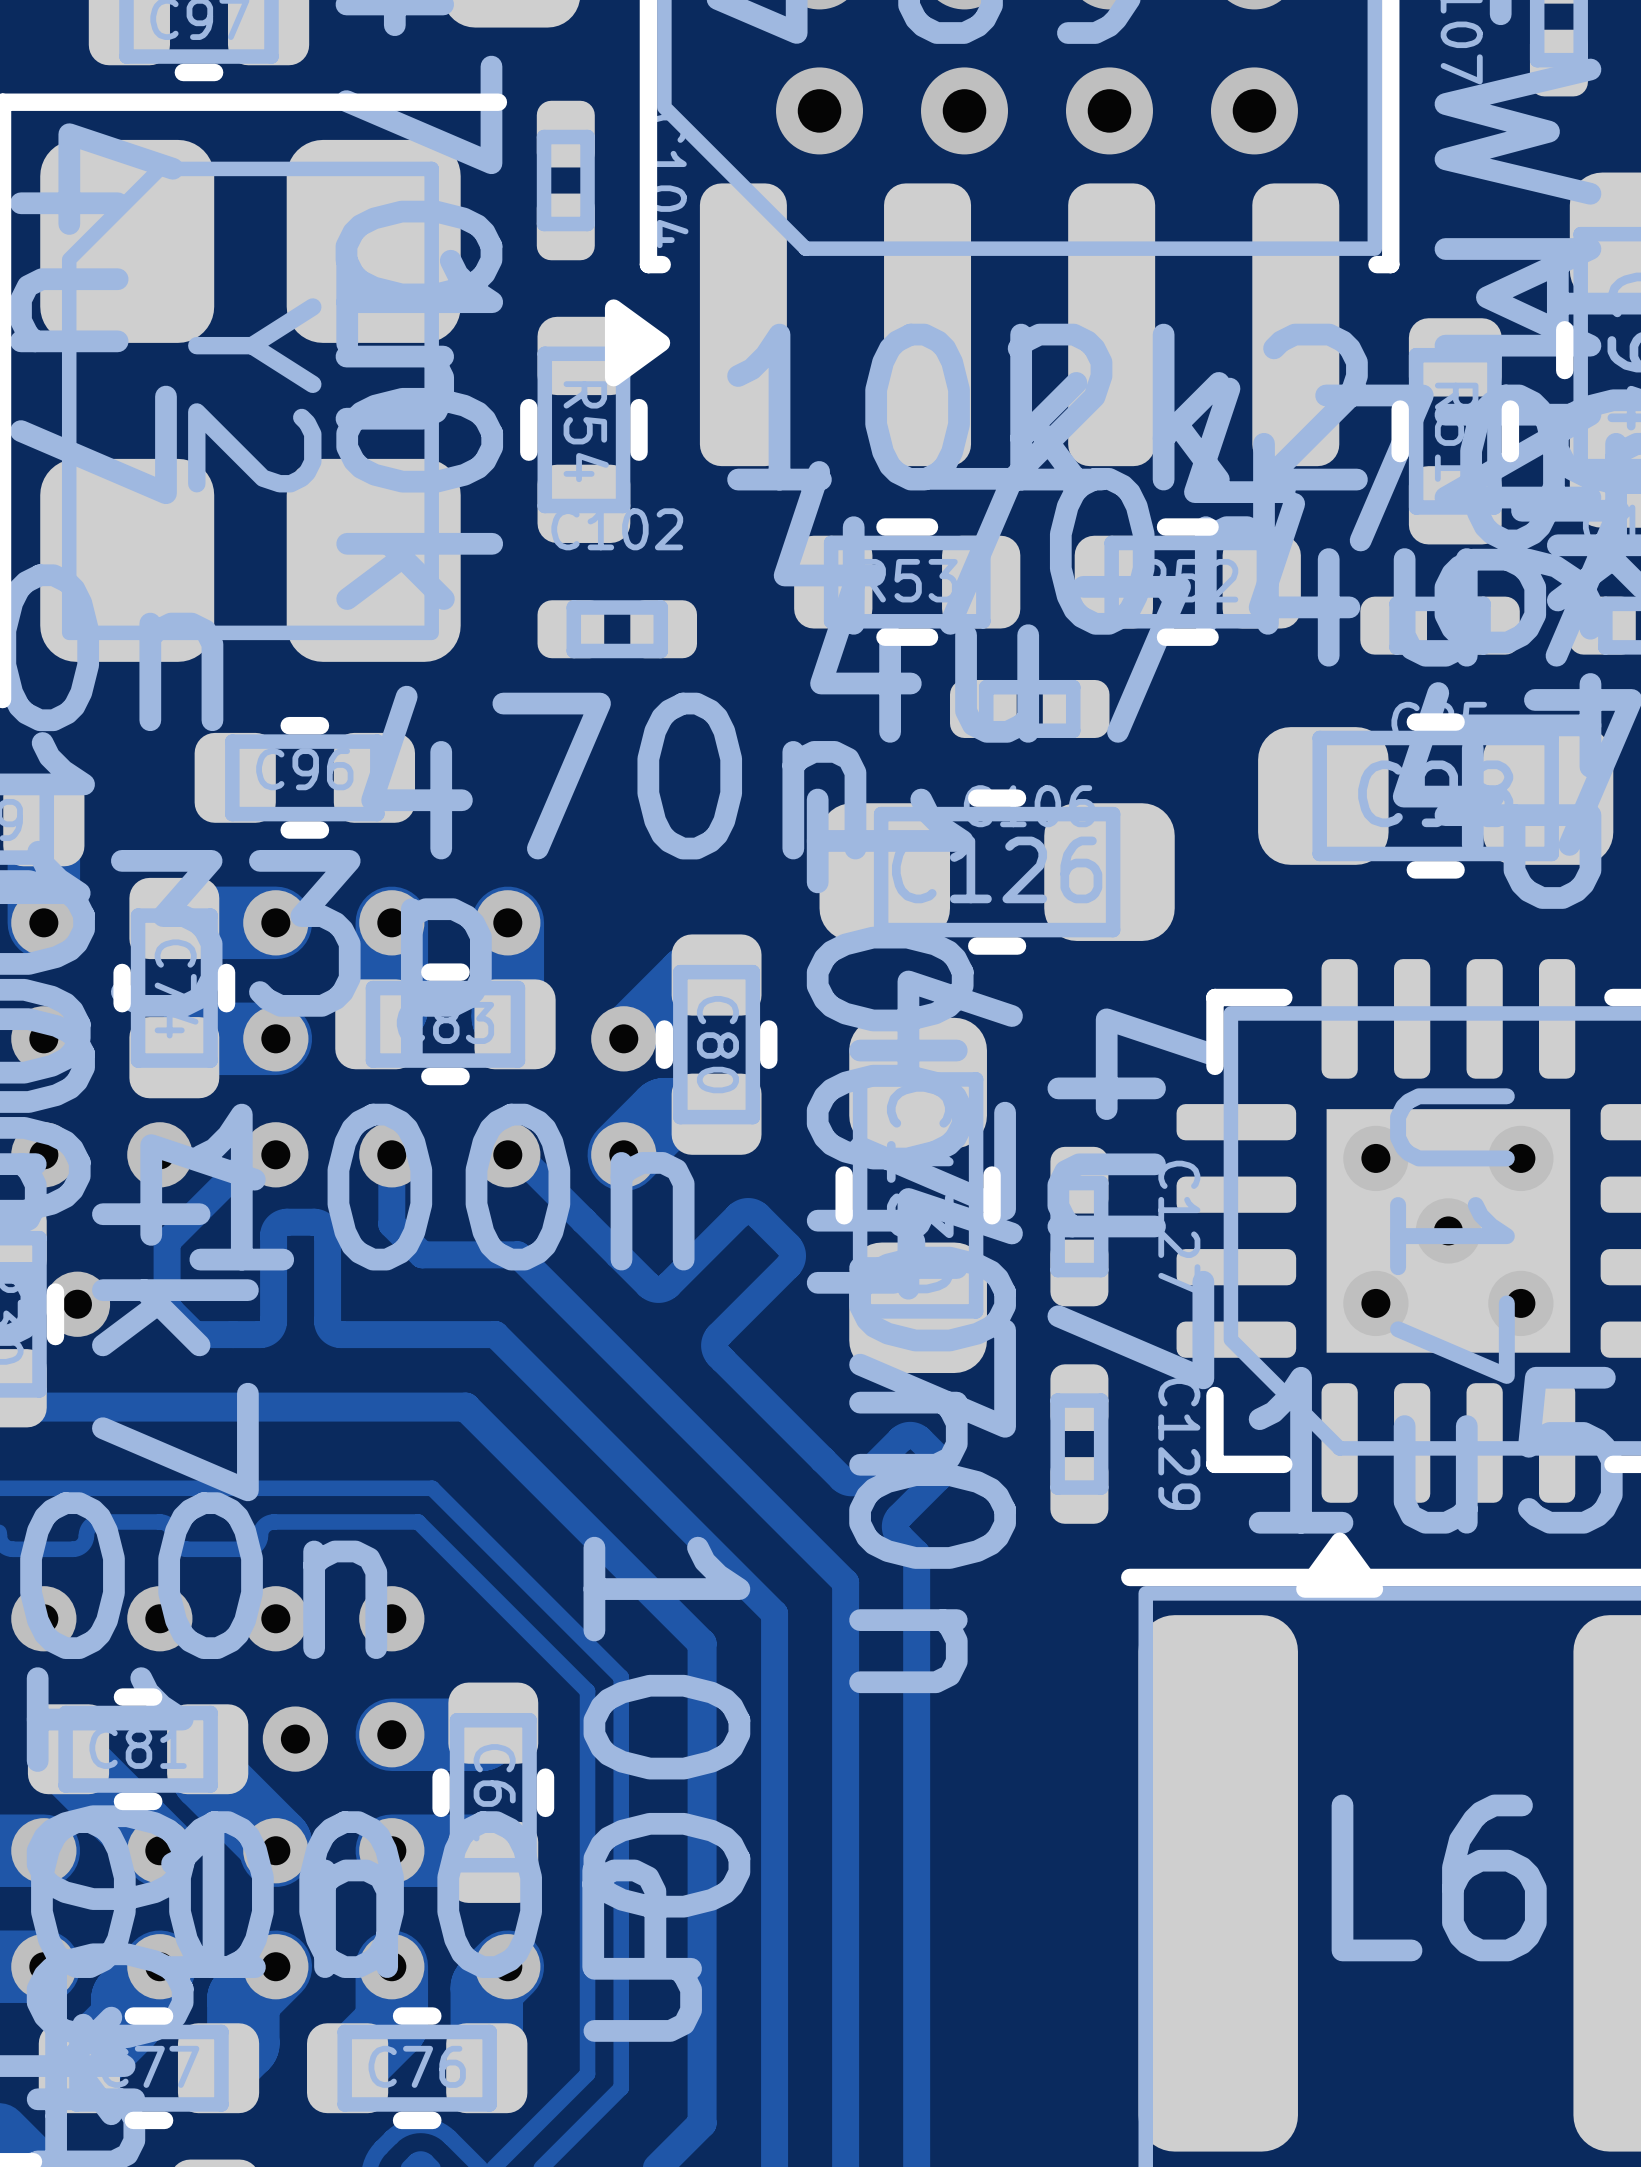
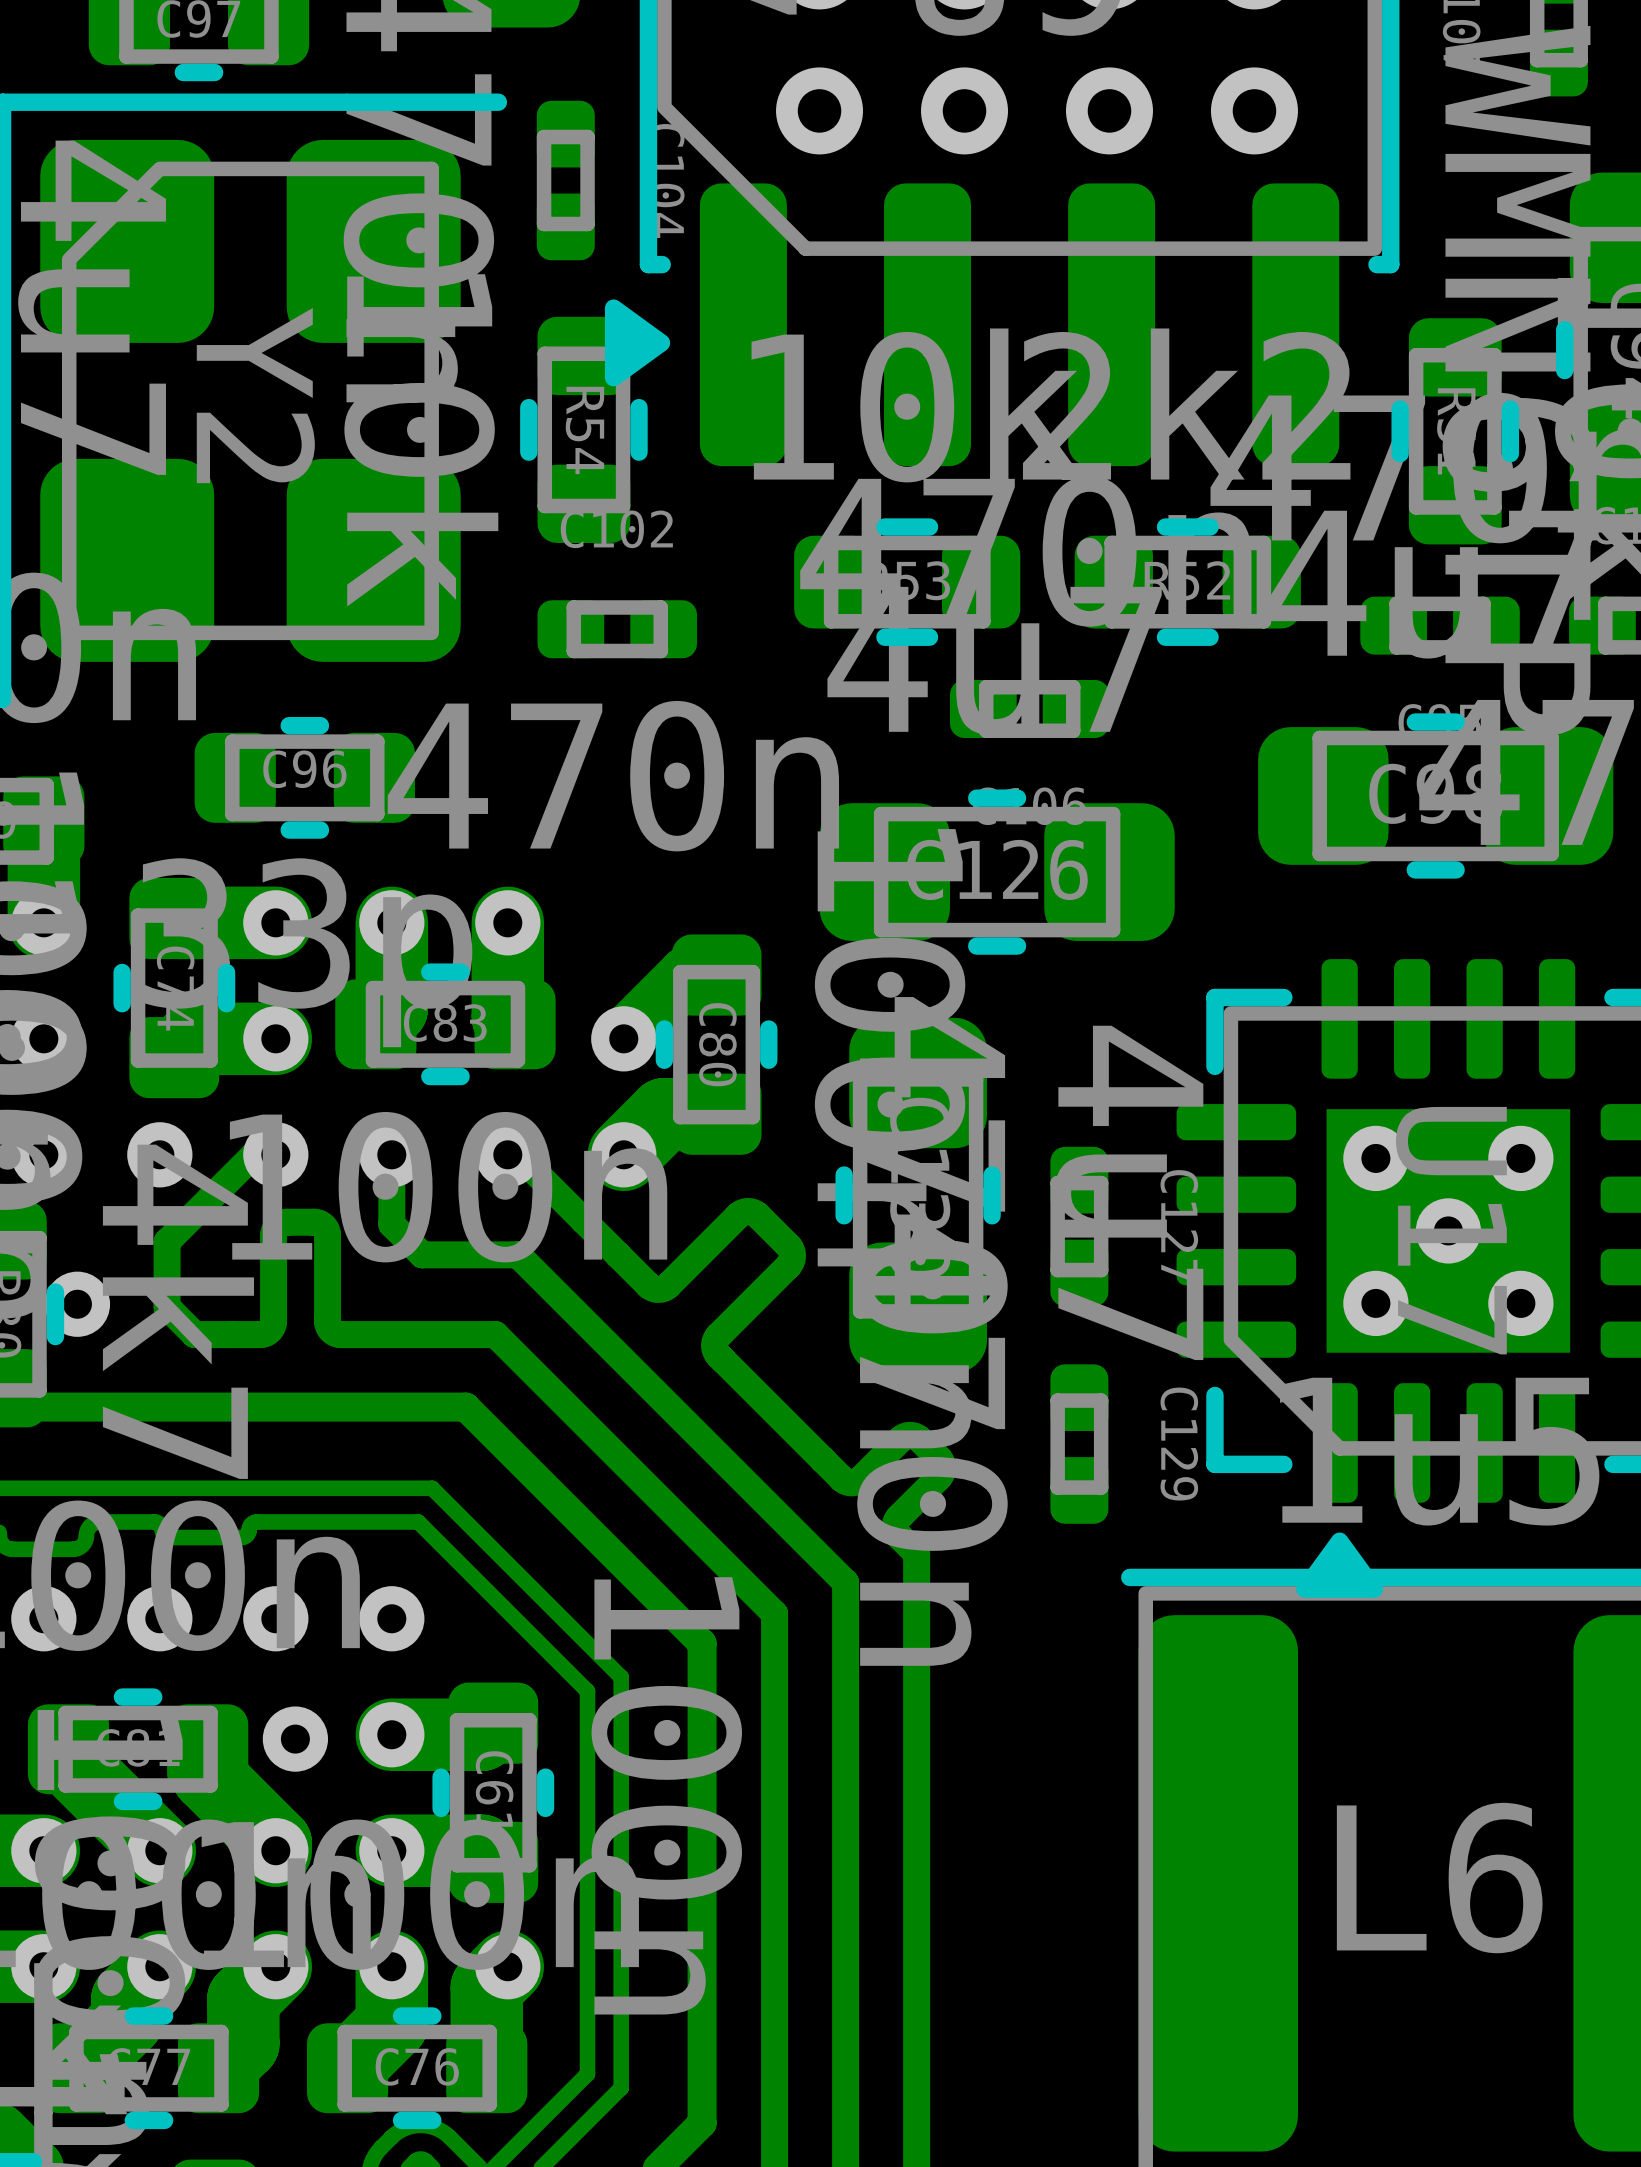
track: (274, 1521) (264, 1525) (257, 1544) (246, 1549) (182, 1548) (175, 1542) (169, 1525) (162, 1522) (154, 1521) -> (274, 1521) (253, 1522) (249, 1526) (247, 1534) (241, 1537) (168, 1537) (163, 1533) (159, 1524) (154, 1521)

